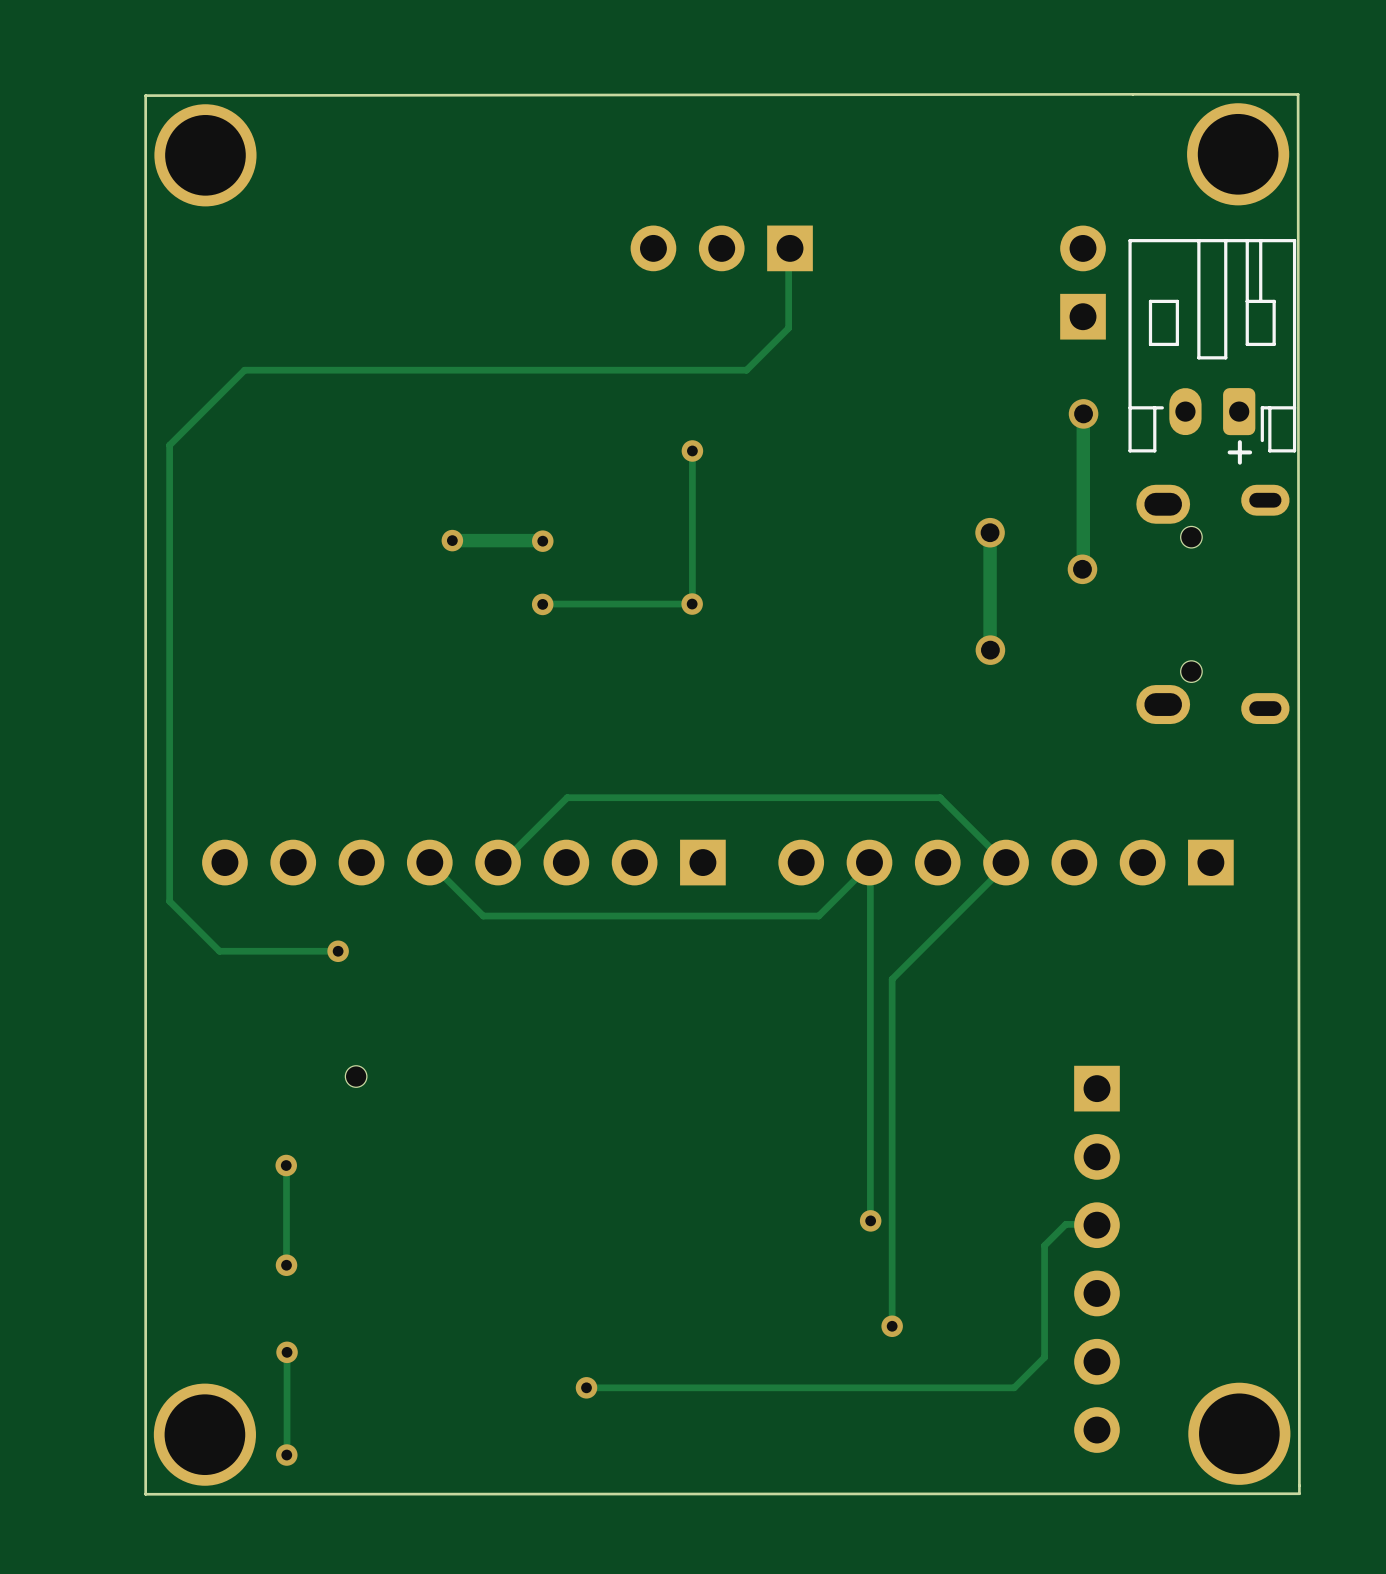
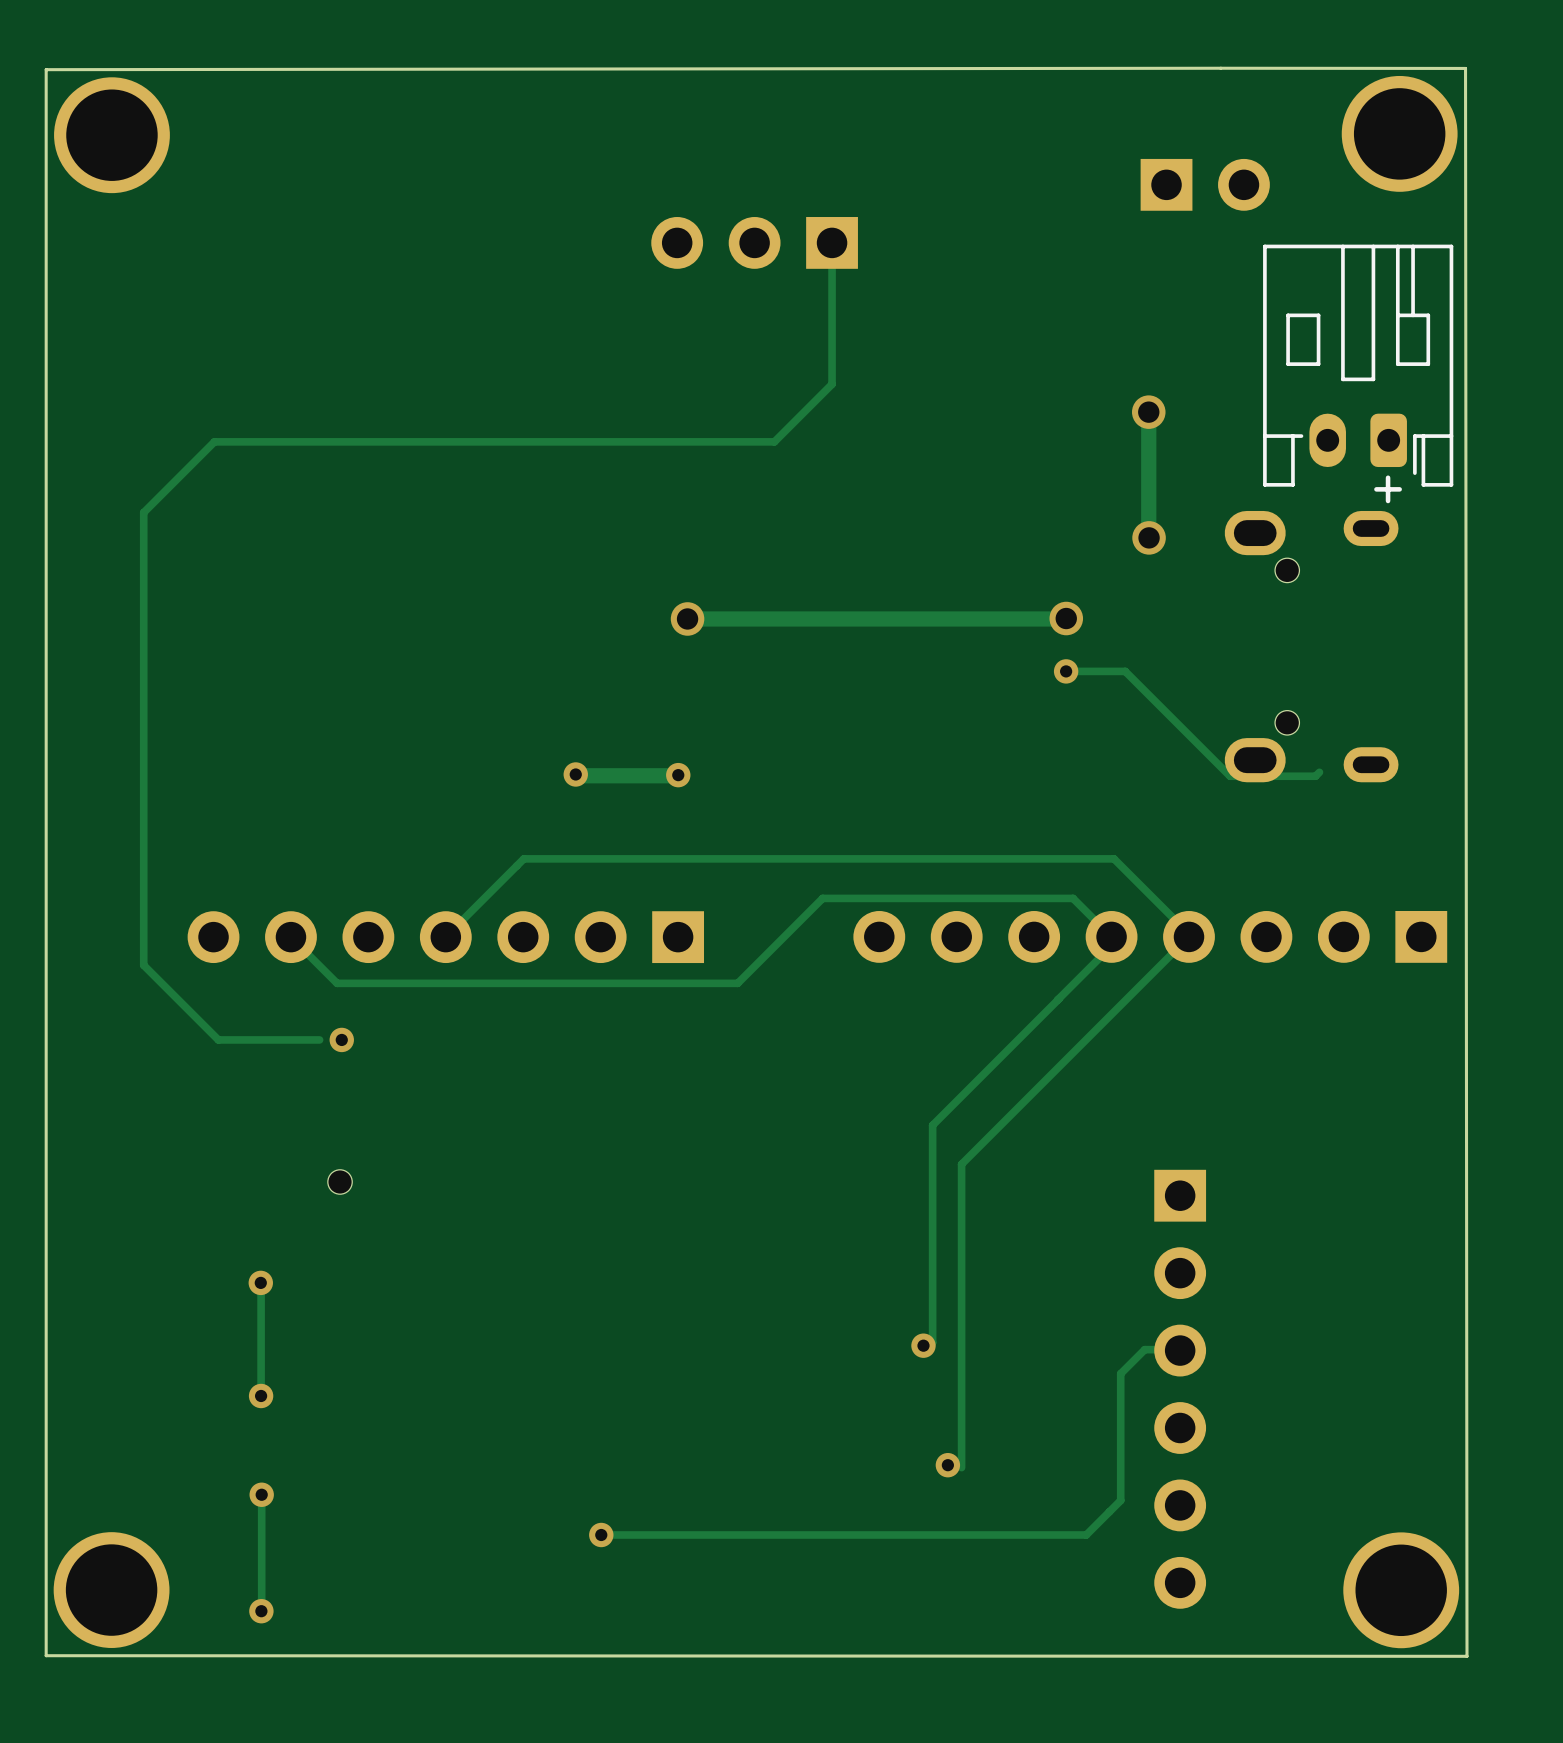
board edge: (1132, 94) (1298, 94) (1299, 1493) (145, 1494) (145, 95) (1132, 94) -> (1220, 68) (1465, 68) (1467, 1656) (46, 1655) (46, 69) (1220, 68)
part position: (1238, 154) -> (1399, 133)
part position: (205, 155) -> (111, 135)
track: (788, 249) (788, 328) (746, 370) (244, 370) (169, 445) (169, 901) (219, 951) (248, 951) -> (830, 243) (832, 245) (832, 384) (774, 441) (214, 441) (143, 512) (143, 965) (218, 1039)
part rotation: 0° (1083, 282) -> 90° clockwise (1205, 184)
part position: (1083, 282) -> (1205, 184)
part position: (1212, 345) -> (1358, 365)
track: none -> (1148, 412) (1148, 537)
via position: (1083, 413) -> (1148, 412)
track: (1083, 414) (1083, 570) -> none
track: (692, 450) (692, 603) -> none
via: (692, 450) -> none
text position: + (1239, 452) -> + (1388, 489)
via: none -> (1149, 537)
track: (990, 532) (990, 649) -> none
via: (990, 532) -> none
track: (452, 540) (542, 541) -> none
via: (452, 540) -> none
via: (542, 541) -> none
via: (1082, 569) -> none
track: none -> (1066, 618) (687, 618)
via: none -> (1066, 618)
via: none -> (687, 618)
via: (542, 604) -> none
track: (692, 604) (543, 604) -> none
via: (692, 604) -> none
track: none -> (1066, 671) (1125, 671) (1230, 776) (1315, 776) (1319, 772)
via position: (990, 650) -> (1066, 671)
via: none -> (575, 774)
via: none -> (678, 775)
track: none -> (677, 775) (576, 775)
part footprint: [202, 839, 726, 886] -> [187, 911, 705, 964]
track: none -> (1185, 930) (1114, 858) (523, 858) (445, 936)
track: none -> (291, 937) (337, 983) (737, 983) (822, 898) (1073, 898) (1111, 936) (1111, 946) (1057, 1000)
part: none -> (1150, 936)
track: none -> (1189, 936) (961, 1164) (961, 1467)
part: (1006, 862) -> none
track: (497, 864) (500, 864) (567, 797) (940, 797) (1006, 864) (892, 979) (892, 1326) -> none
track: (433, 866) (483, 916) (818, 916) (870, 864) (870, 1220) -> none
track: none -> (1059, 998) (932, 1125) (932, 1342) (925, 1342)
via position: (338, 951) -> (341, 1039)
part position: (1239, 1433) -> (1401, 1590)
part position: (204, 1434) -> (111, 1590)

